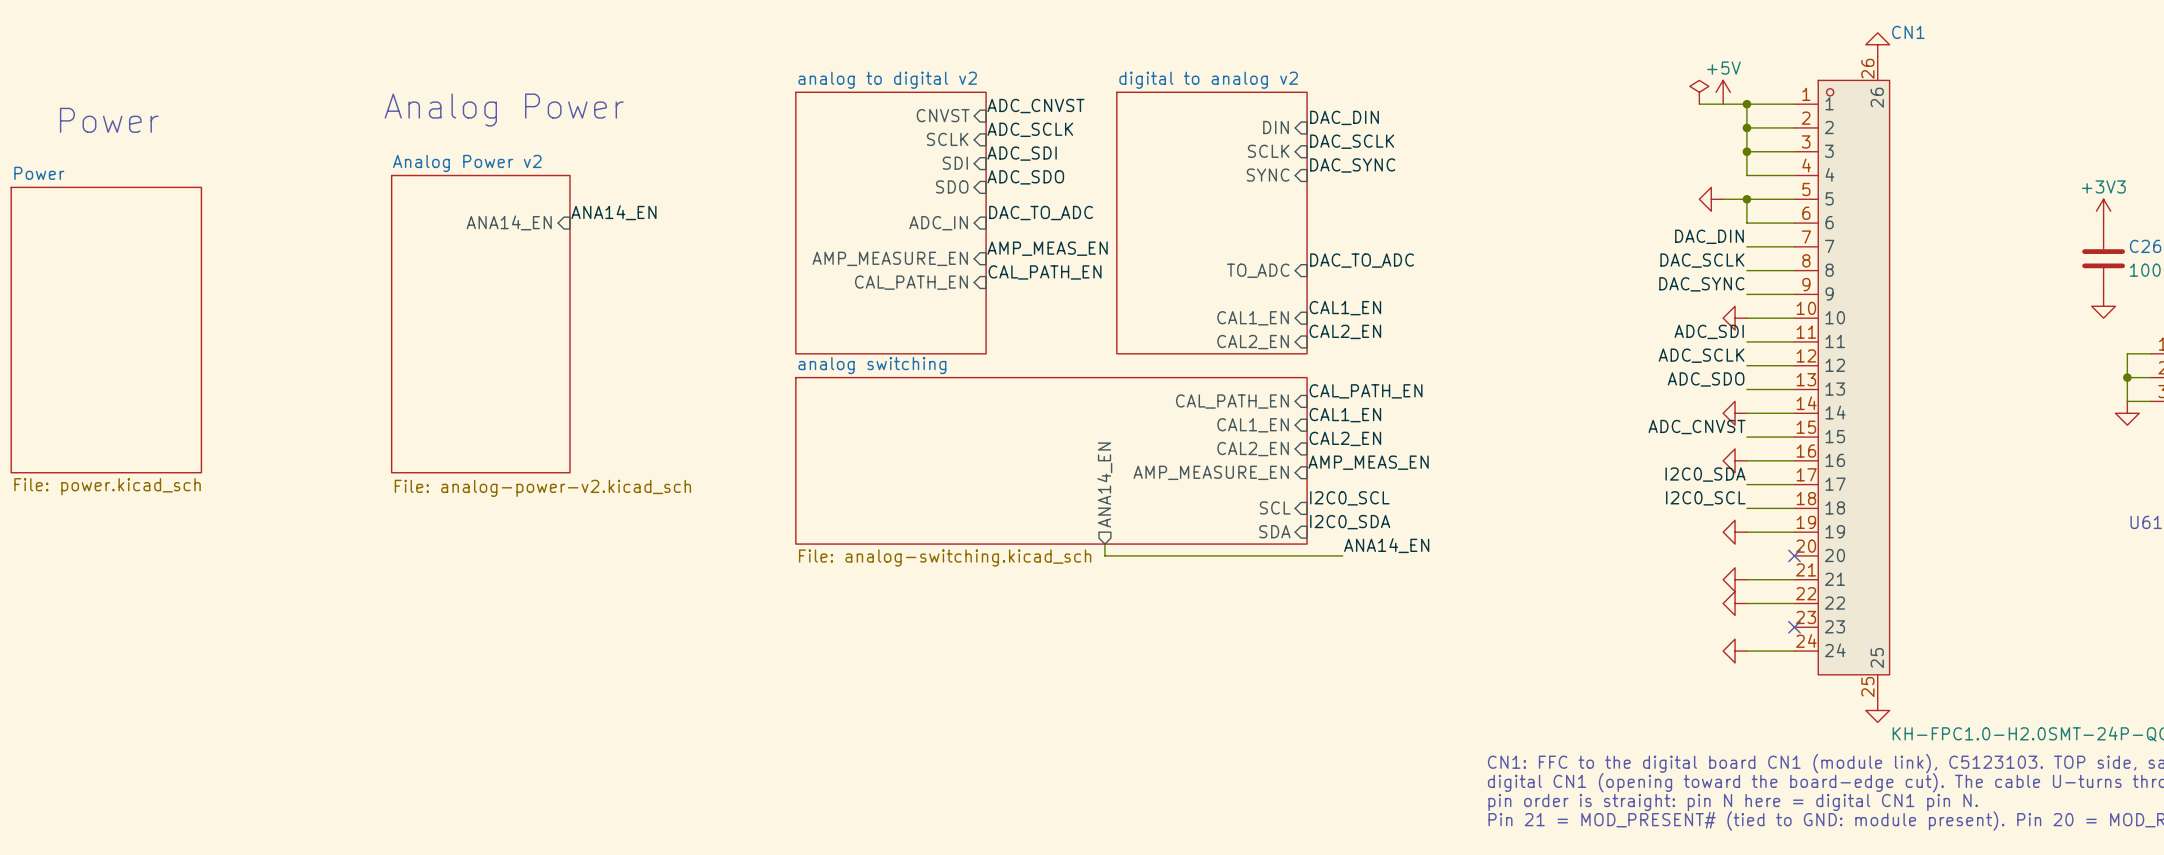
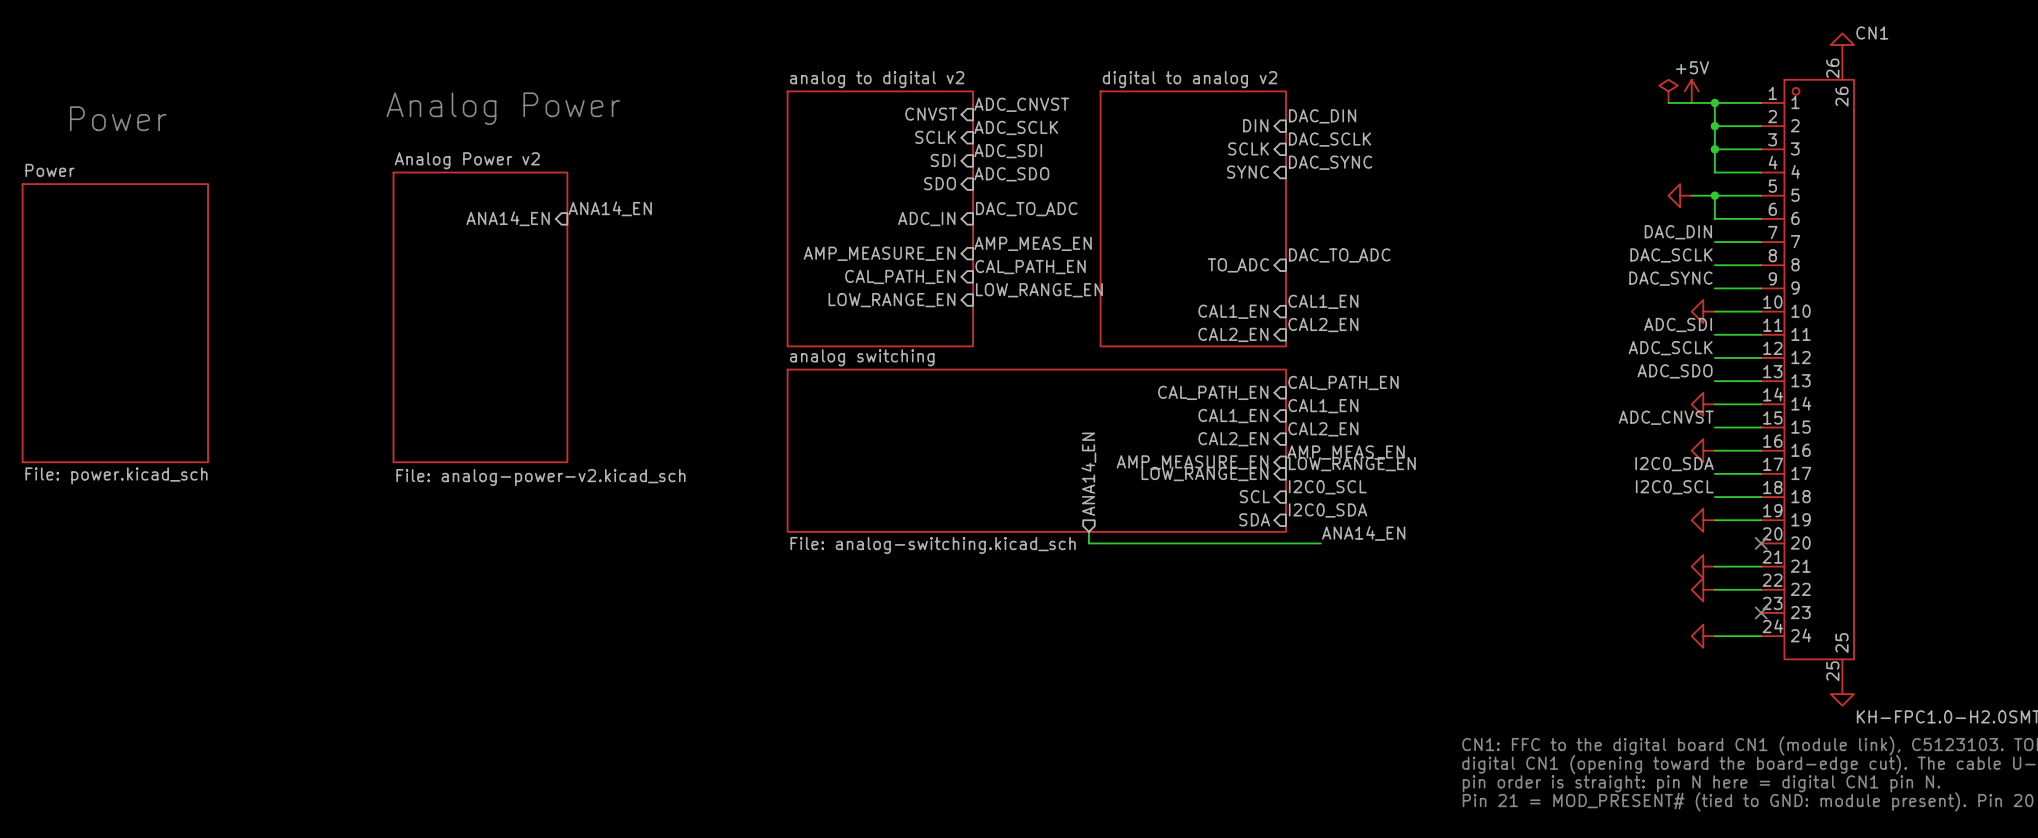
label: none -> LOW_RANGE_EN (1039, 290)
sheet pin: none -> LOW_RANGE_EN (892, 300)
label: none -> LOW_RANGE_EN (1352, 464)
sheet pin: none -> LOW_RANGE_EN (1204, 474)

